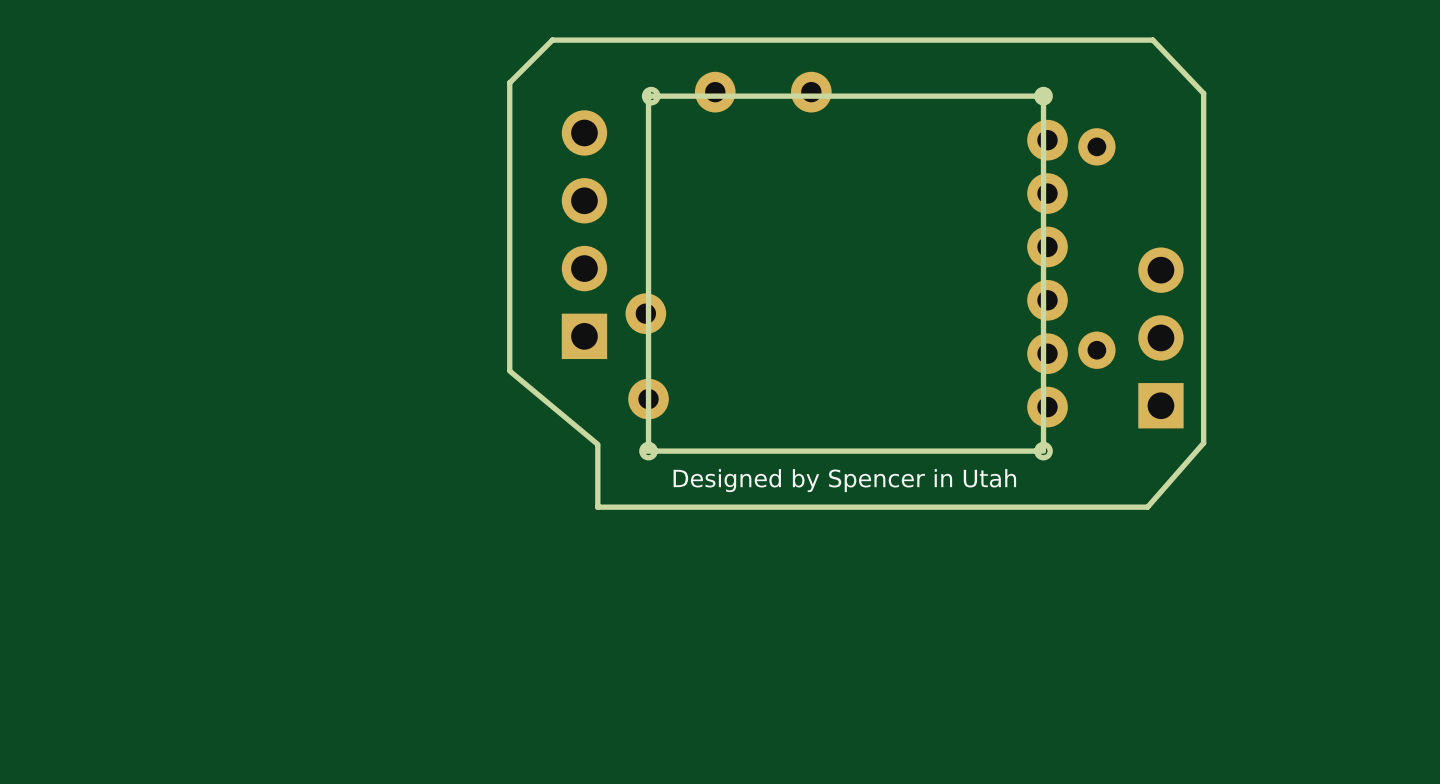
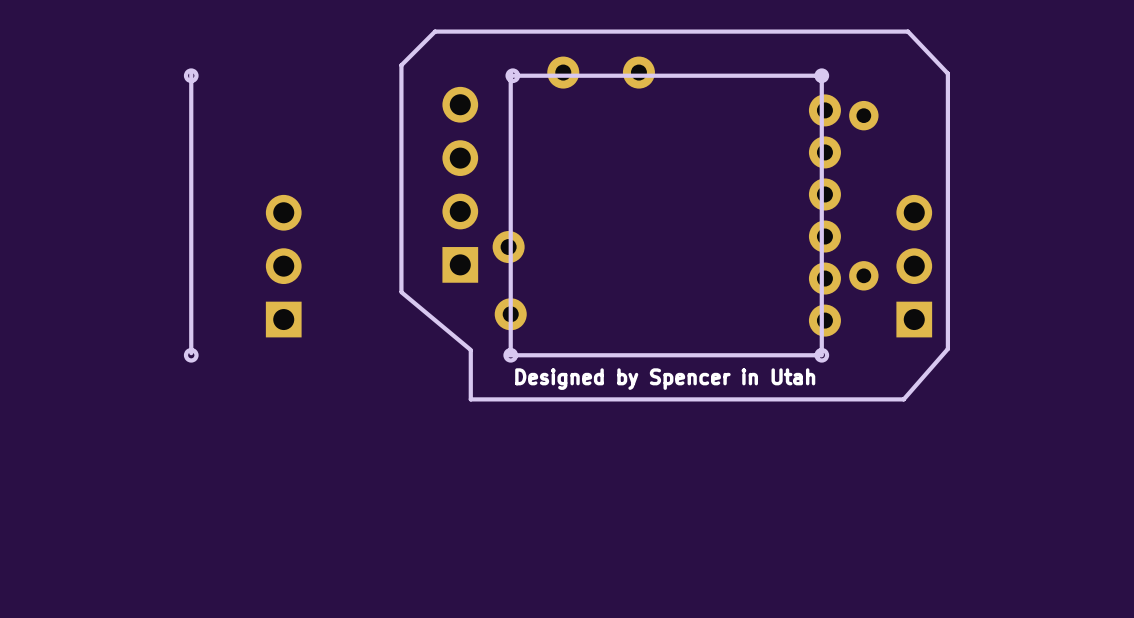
round board edge: none -> [183, 68, 199, 84]
board edge: none -> (191, 73) (191, 353)
part: none -> (283, 266)
round board edge: none -> [183, 347, 199, 363]

